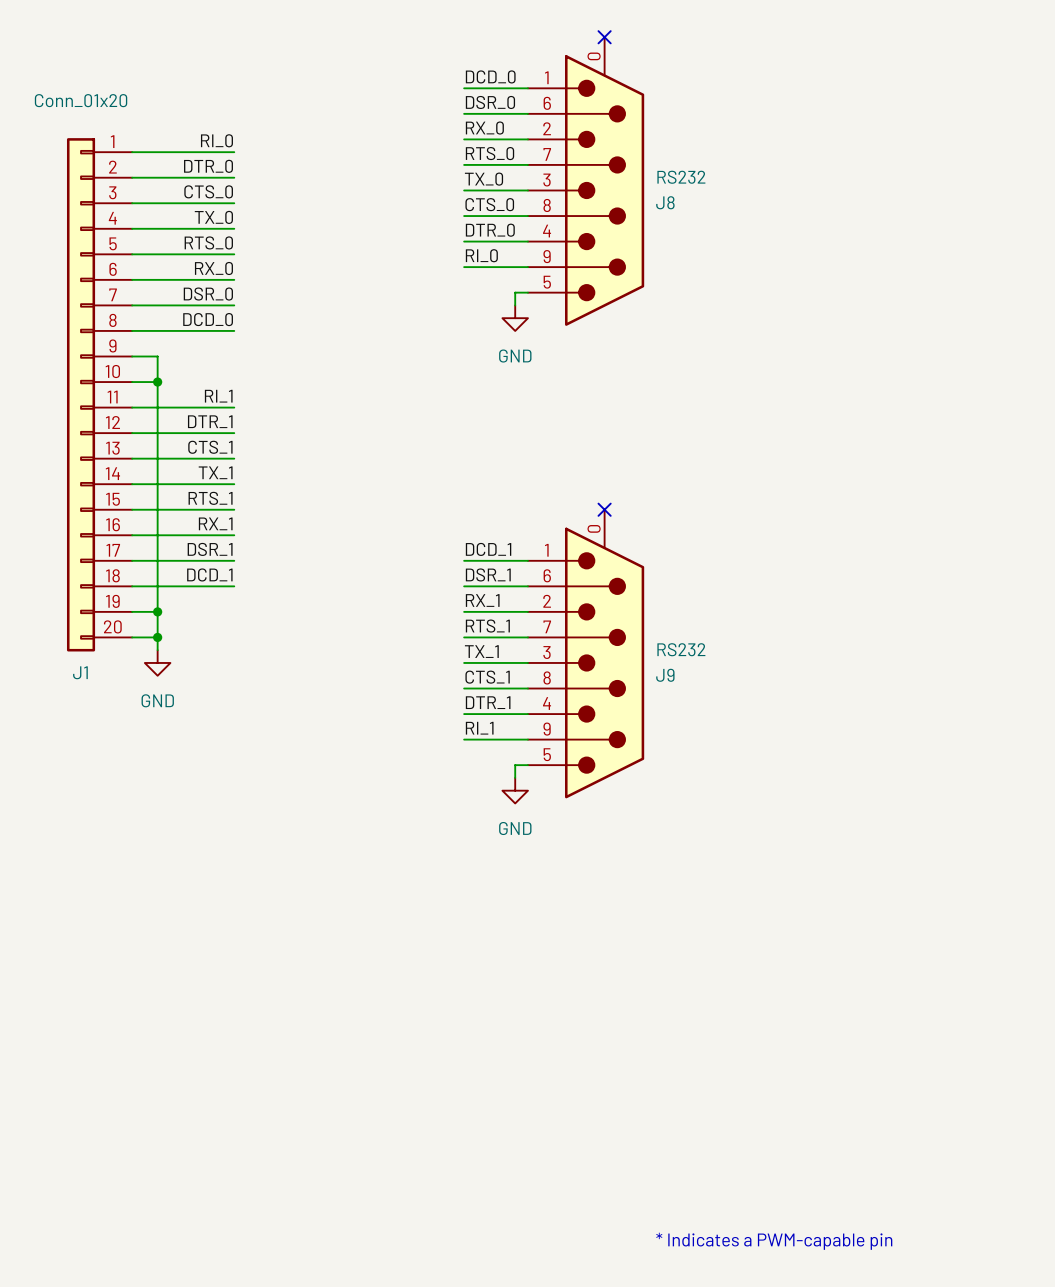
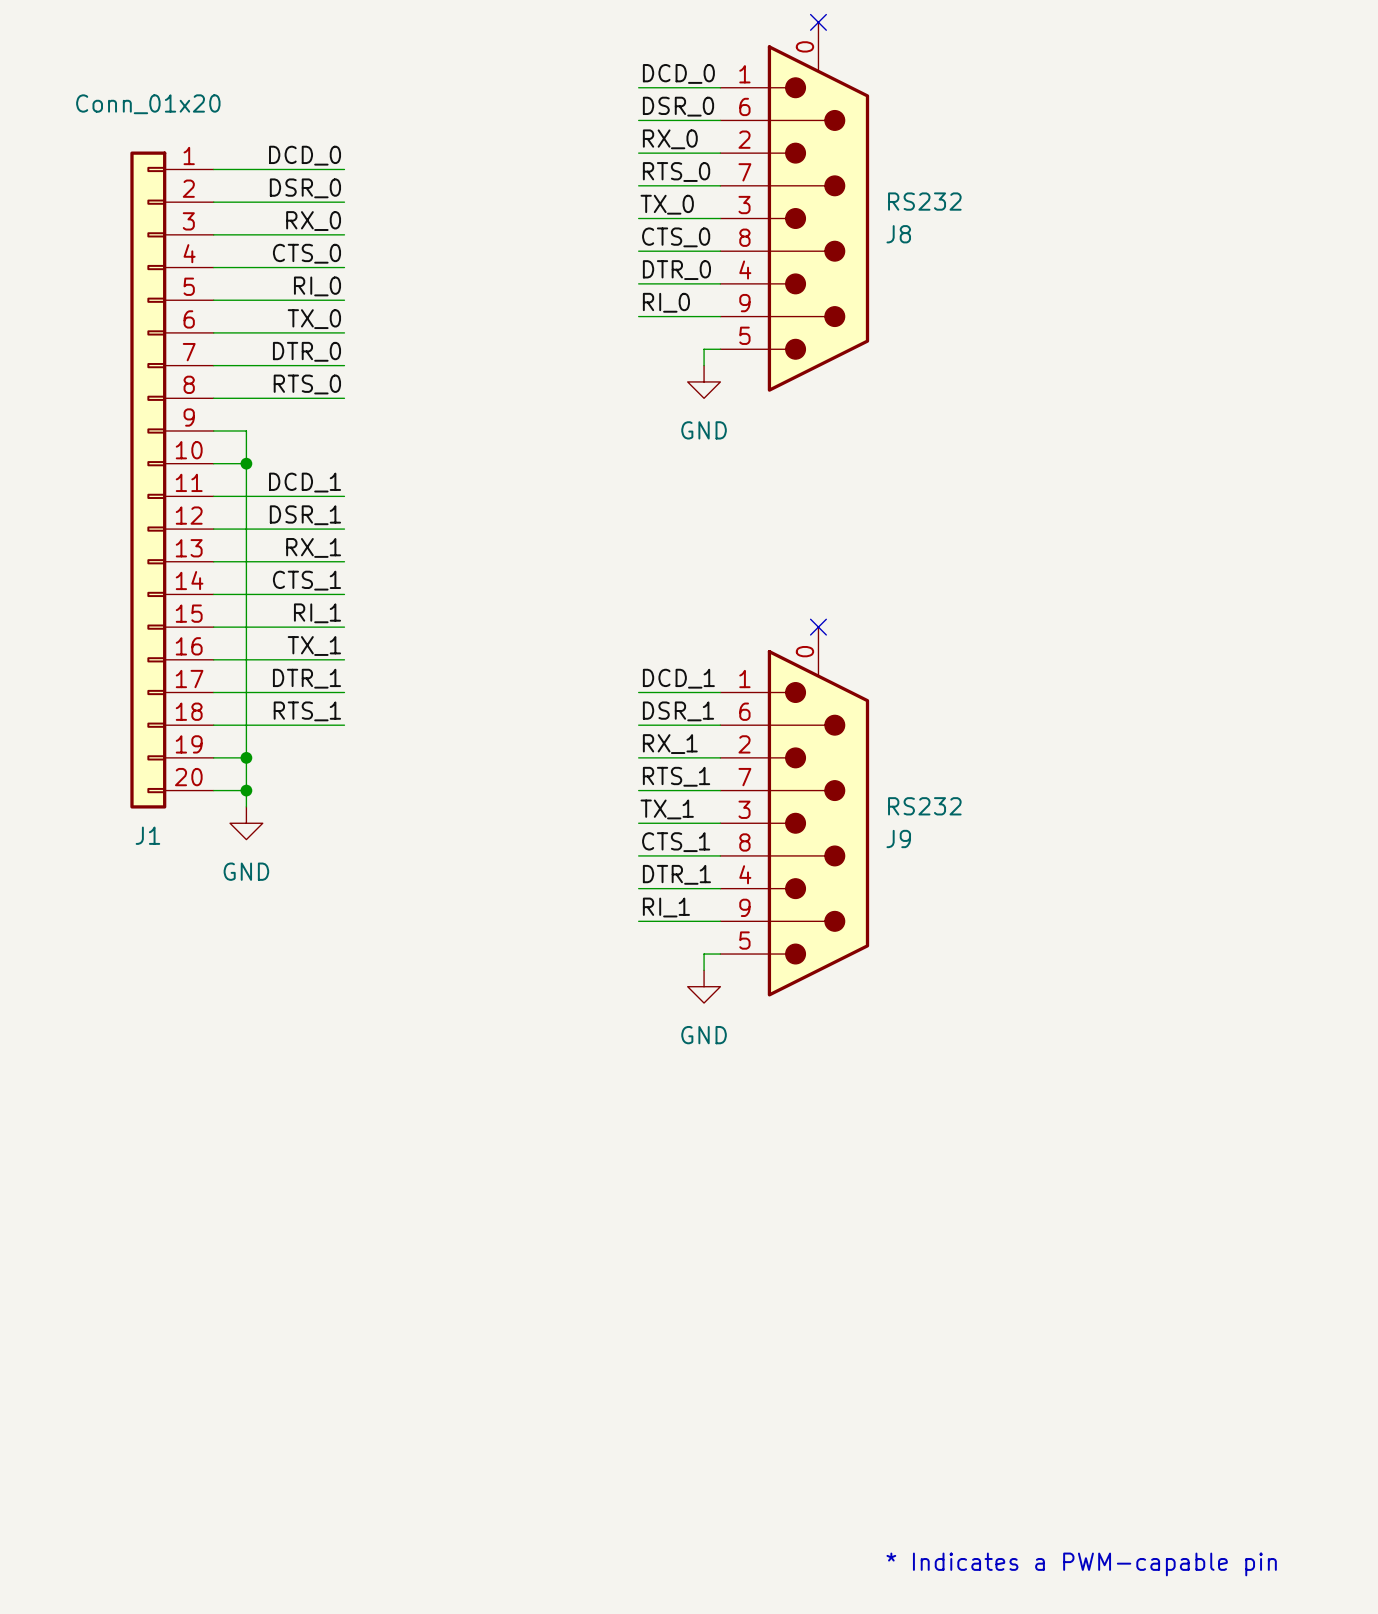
label: RI_0 (216, 140) -> DCD_0 (305, 155)
label: DTR_0 (208, 166) -> DSR_0 (305, 188)
label: CTS_0 (208, 191) -> RX_0 (313, 221)
label: TX_0 (213, 217) -> CTS_0 (306, 253)
label: RTS_0 (208, 242) -> RI_0 (317, 286)
label: RX_0 (213, 268) -> TX_0 (314, 319)
label: DSR_0 (208, 294) -> DTR_0 (306, 351)
label: DCD_0 (208, 319) -> RTS_0 (307, 384)
label: RI_1 (218, 396) -> DCD_1 (305, 482)
label: DTR_1 (210, 421) -> DSR_1 (305, 515)
label: CTS_1 (210, 447) -> RX_1 (313, 547)
label: TX_1 (215, 472) -> CTS_1 (306, 580)
label: RTS_1 (210, 498) -> RI_1 (317, 613)
label: RX_1 (215, 523) -> TX_1 (314, 646)
label: DSR_1 (210, 549) -> DTR_1 (306, 678)
label: DCD_1 (209, 574) -> RTS_1 (307, 711)

